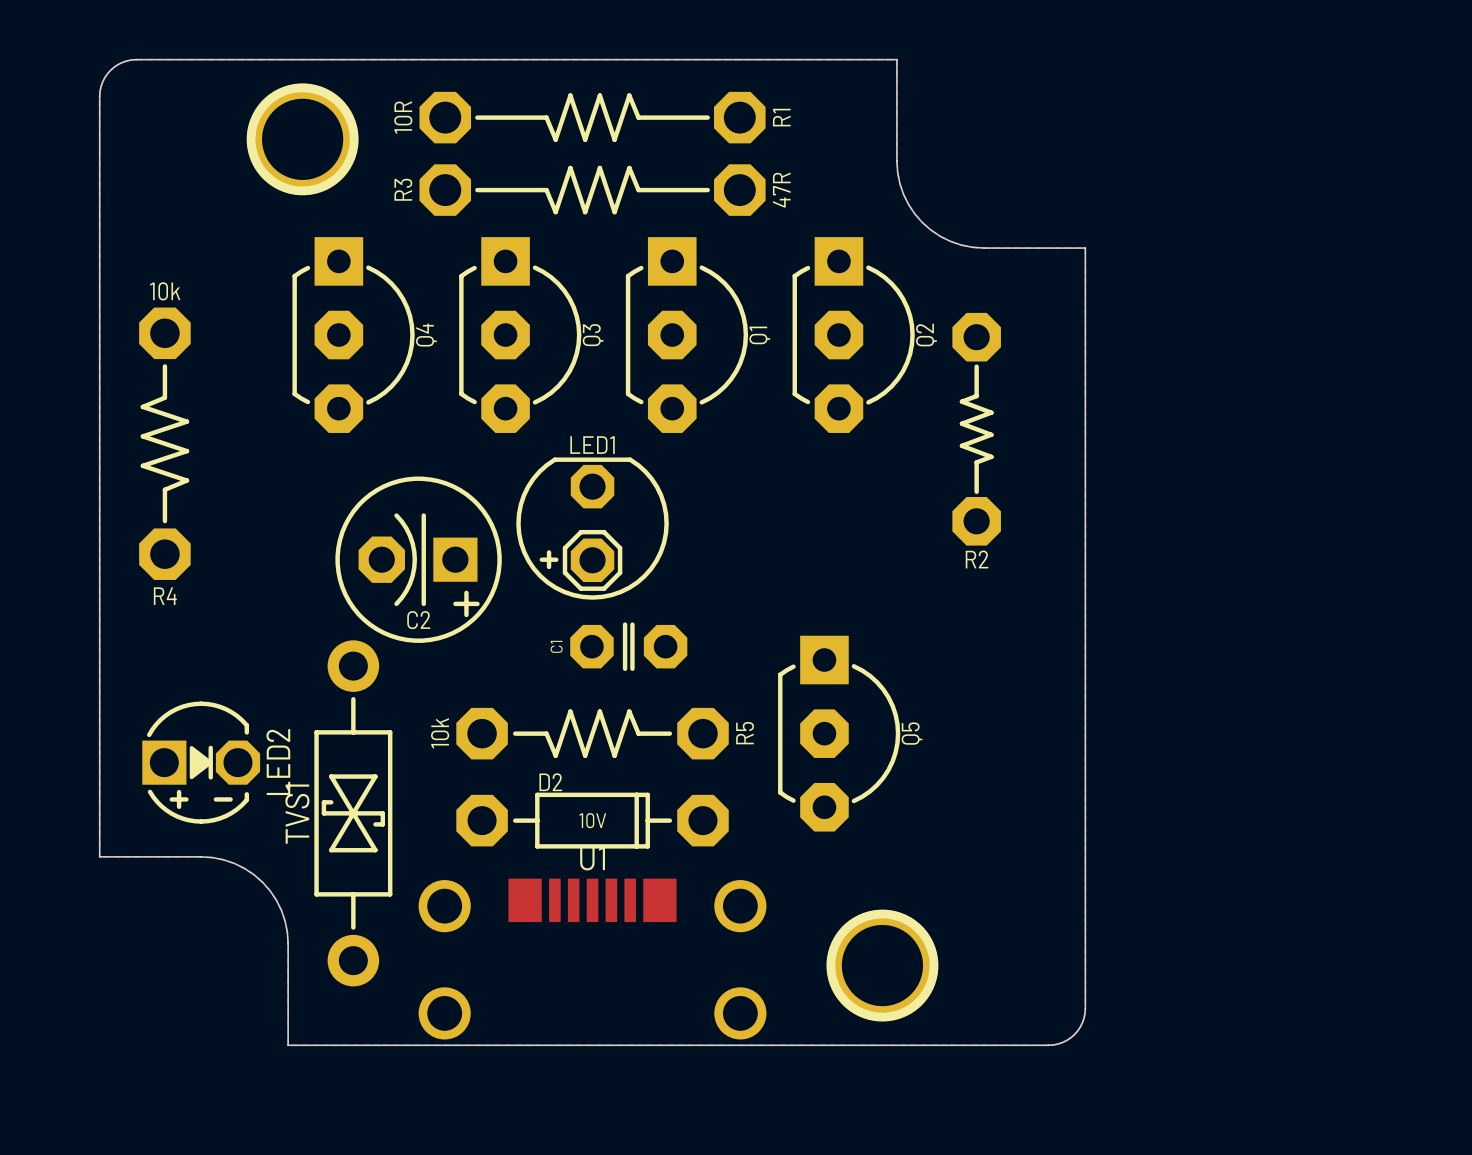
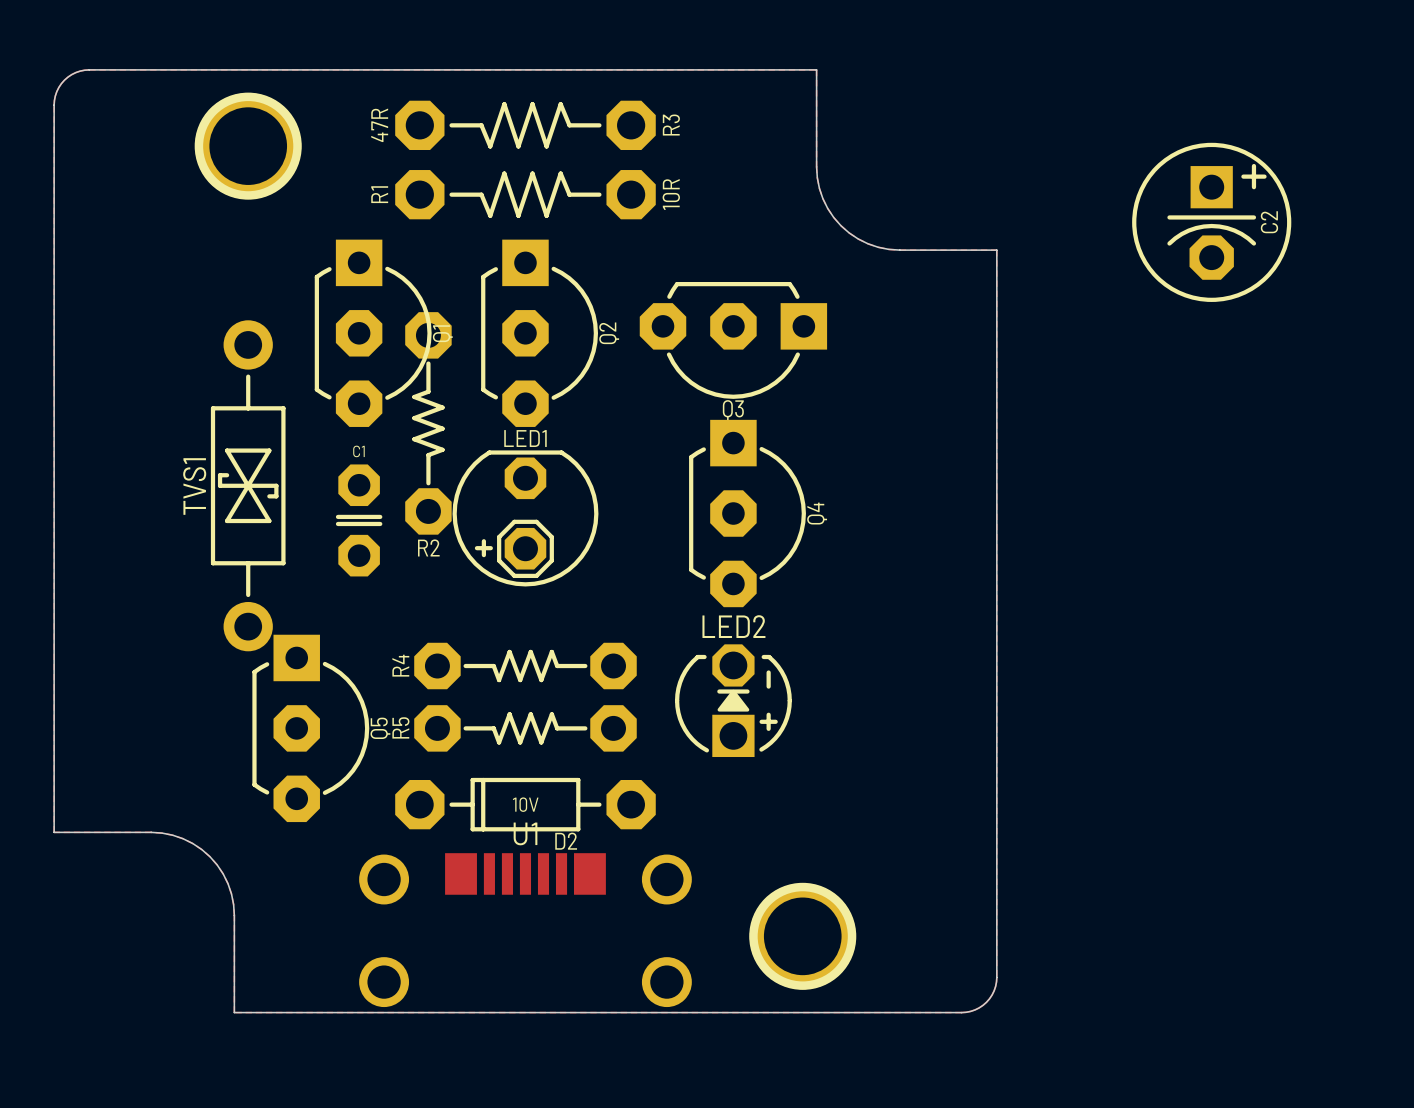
R1 footprint: [419, 91, 766, 144] -> [395, 170, 656, 220]
R1 value position: 10R (403, 117) -> 10R (671, 194)
R1 name position: R1 (781, 117) -> R1 (379, 194)
R3 footprint: [419, 164, 766, 216] -> [395, 100, 656, 150]
R3 name position: R3 (403, 189) -> R3 (671, 125)
R3 value position: 47R (781, 190) -> 47R (379, 125)
R4 value: 10k (165, 291) -> none
R4 footprint: [139, 307, 191, 580] -> [414, 642, 637, 690]
Q4 position: (353, 335) -> (747, 513)
Q3 rotation: 0° (520, 335) -> 90° clockwise (733, 340)
Q3 position: (520, 335) -> (733, 340)
Q1 position: (686, 335) -> (373, 333)
Q2 position: (853, 335) -> (539, 333)
R2 position: (976, 429) -> (428, 423)
C2 rotation: 0° (418, 559) -> 90° counterclockwise (1211, 222)
C2 position: (418, 559) -> (1211, 222)
R4 name position: R4 (165, 596) -> R4 (400, 665)
C1 rotation: 0° (628, 646) -> 90° clockwise (359, 520)
C1 position: (628, 646) -> (359, 520)
R5 footprint: [456, 707, 729, 760] -> [414, 705, 637, 752]
R5 value: 10k (440, 733) -> none
R5 name position: R5 (745, 733) -> R5 (400, 727)
Q5 position: (839, 733) -> (310, 728)
LED2 rotation: 0° (201, 762) -> 90° counterclockwise (733, 700)
LED2 position: (201, 762) -> (733, 700)
TVS1 position: (353, 813) -> (248, 485)
D2 rotation: 0° (592, 820) -> 180° (525, 804)

